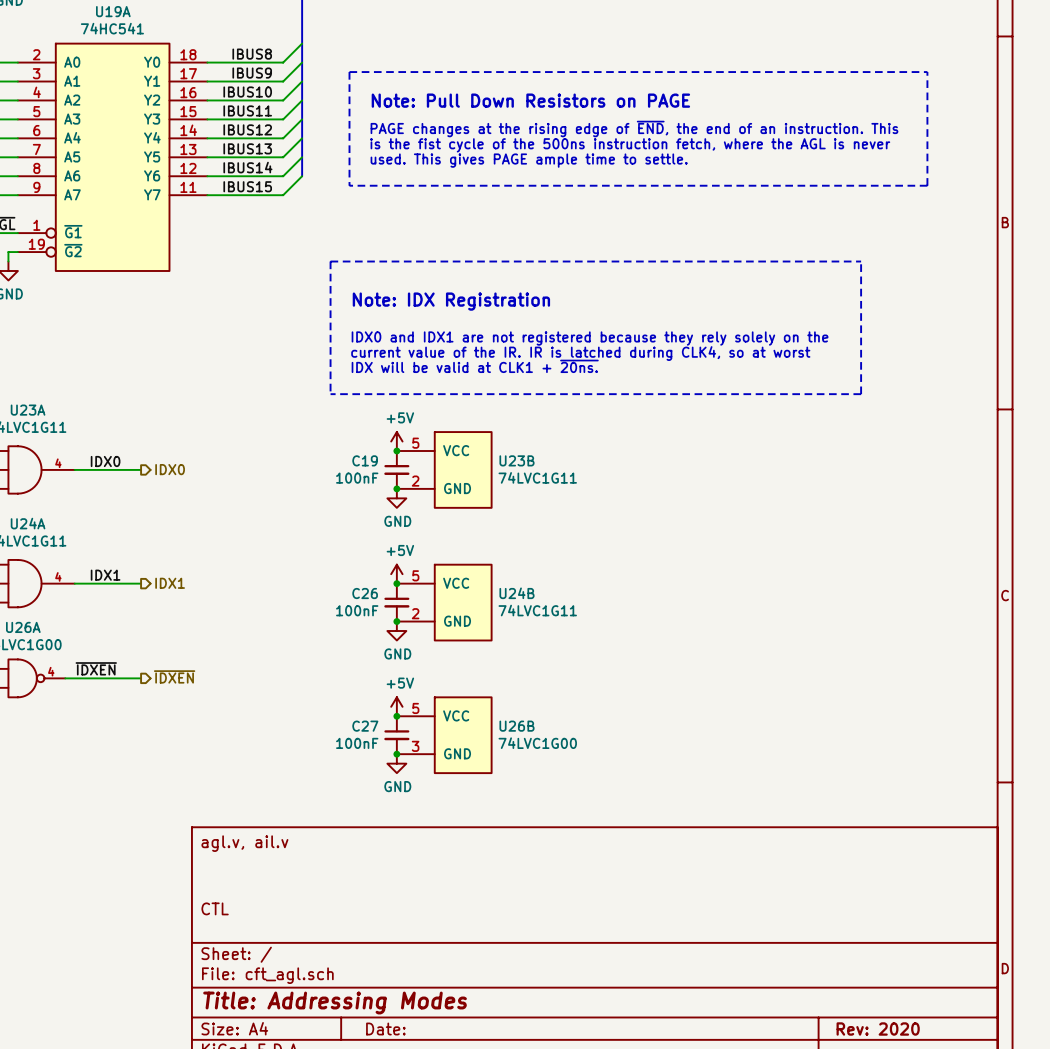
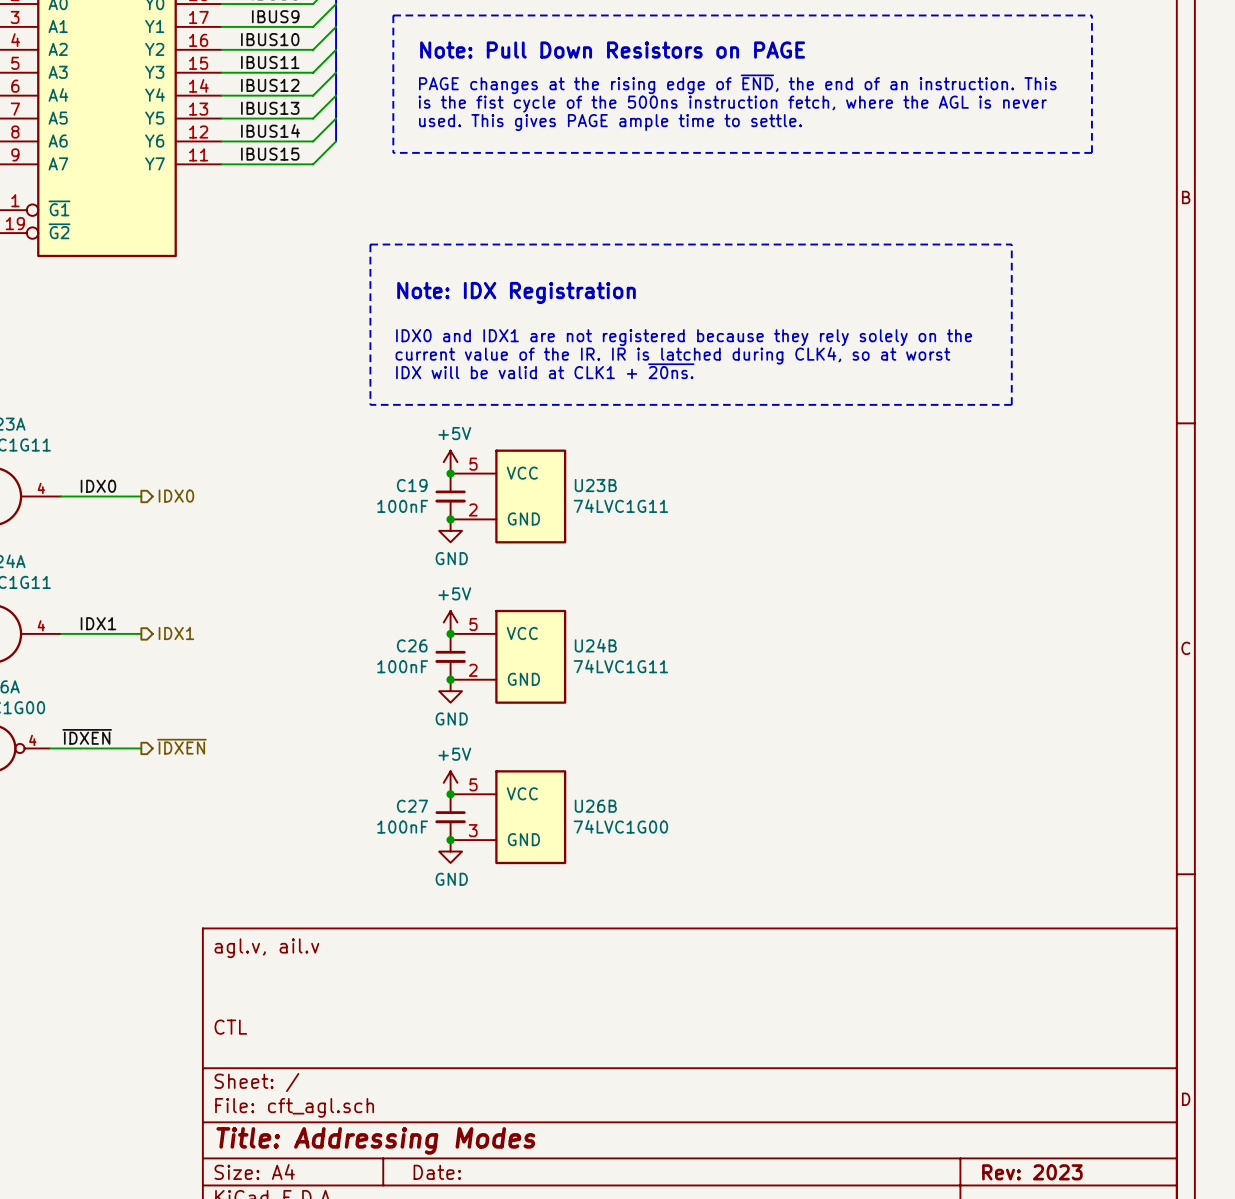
title block: Rev: 2020 (878, 1029) -> Rev: 2023 (1032, 1172)

